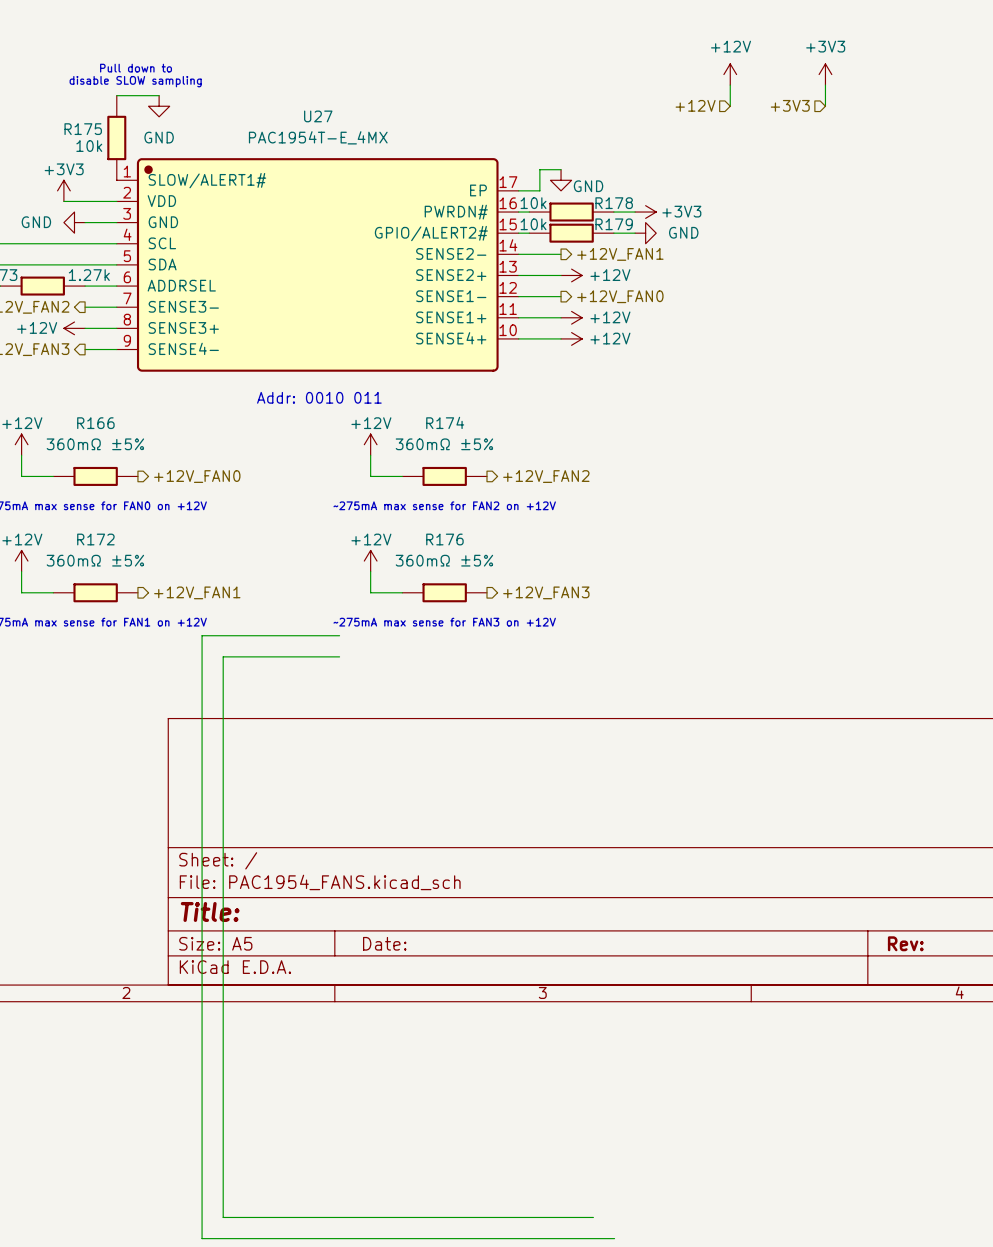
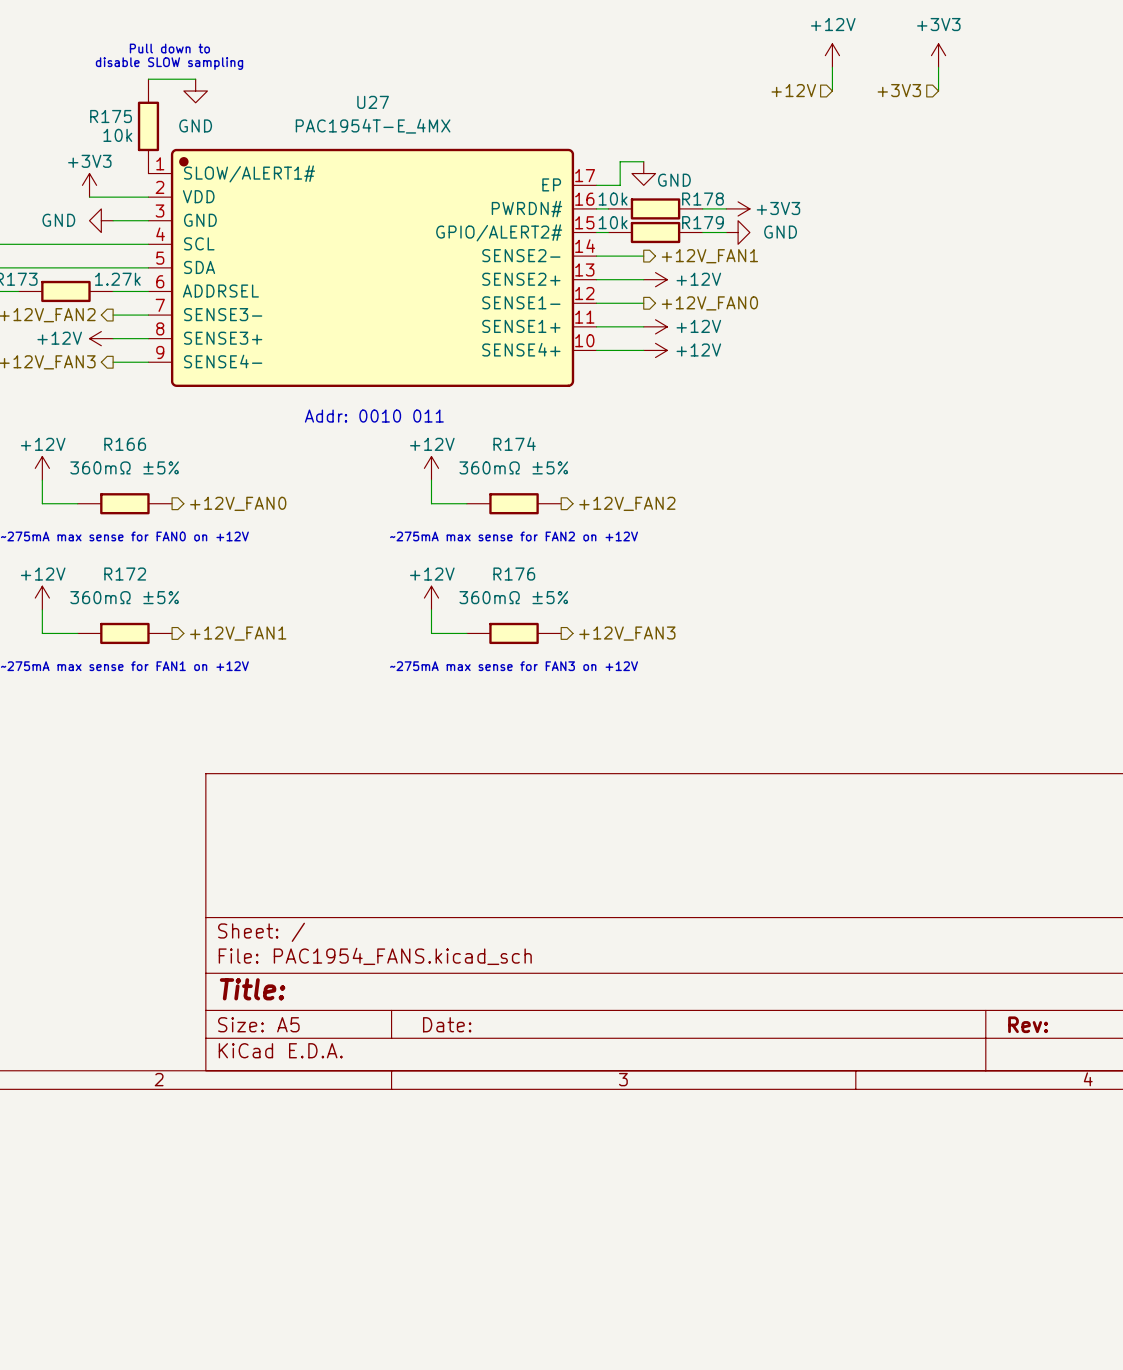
wire: (339, 635) (202, 635) (202, 1238) (614, 1238) -> none
wire: (339, 656) (223, 656) (223, 1217) (593, 1217) -> none

